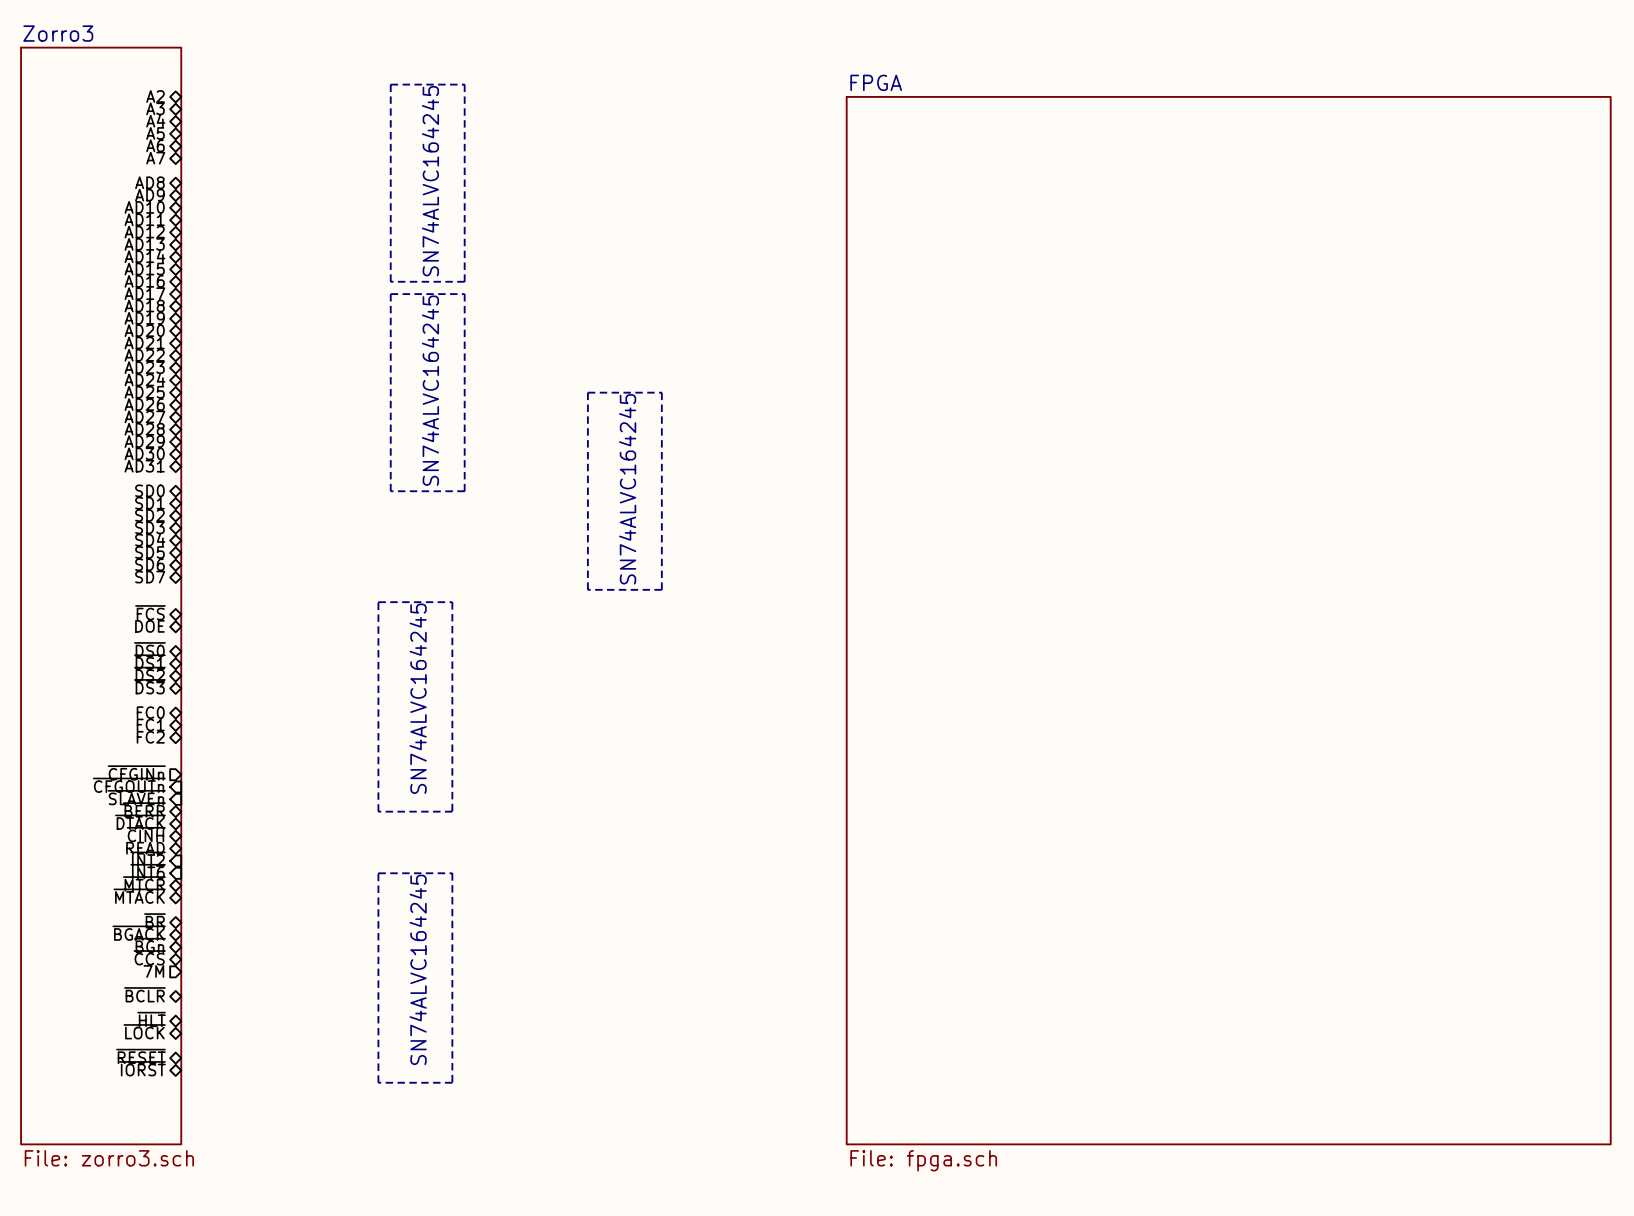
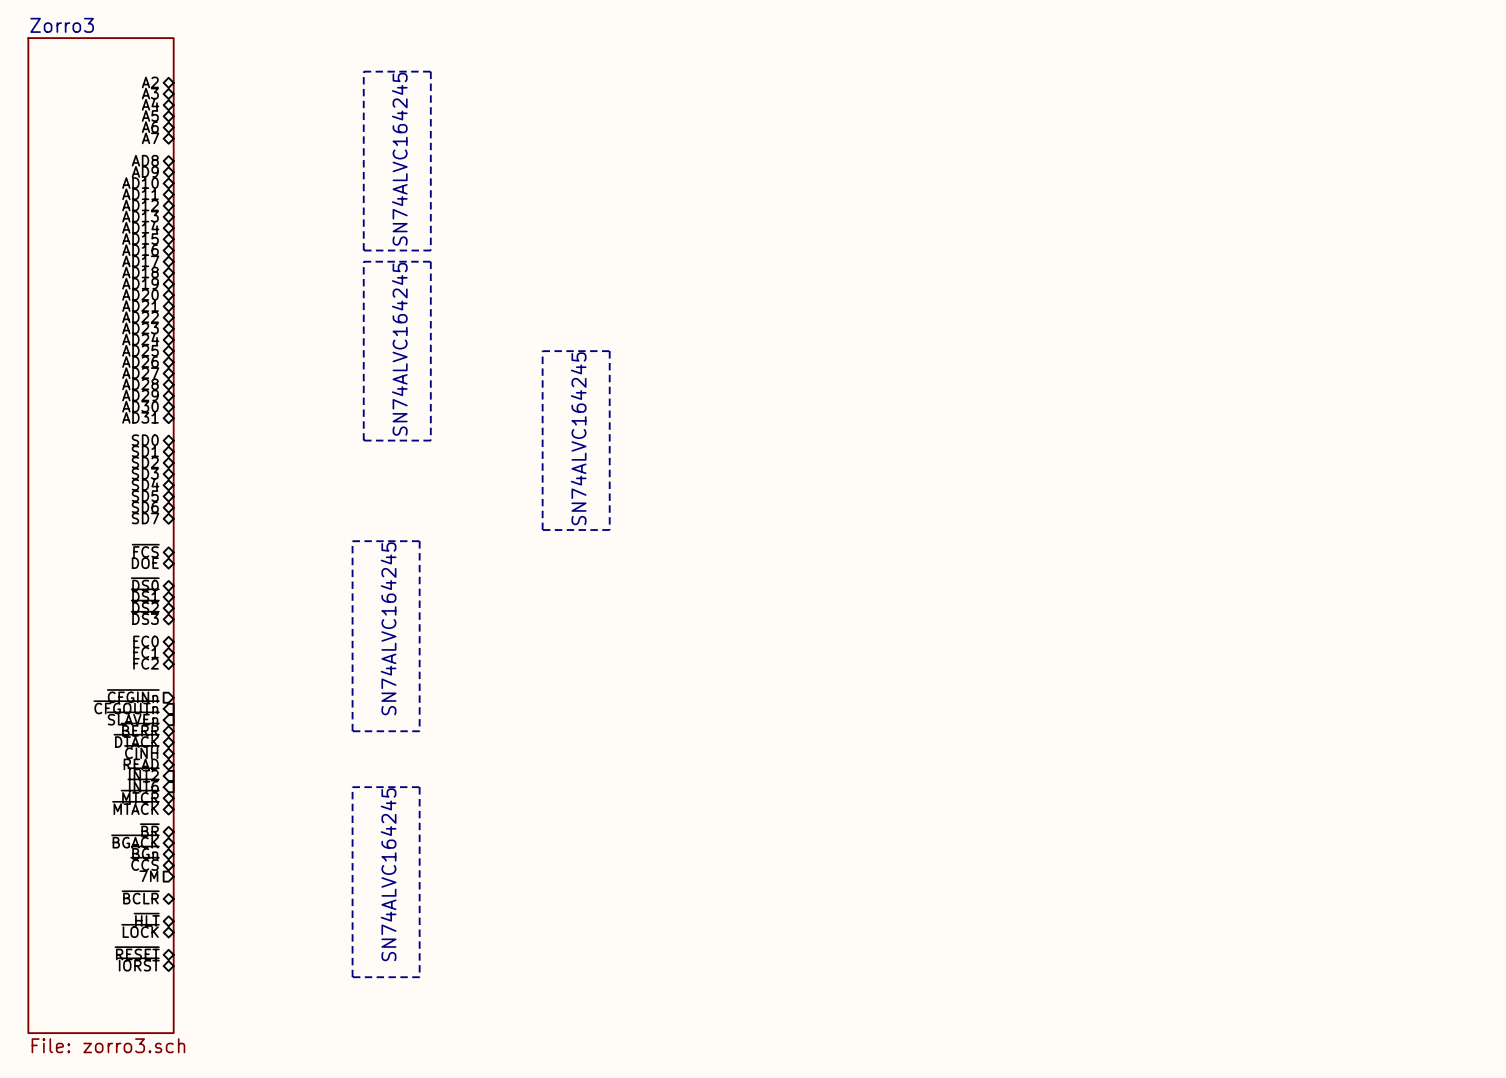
sheet FPGA: File: fpga.sch (1228, 620) -> none

